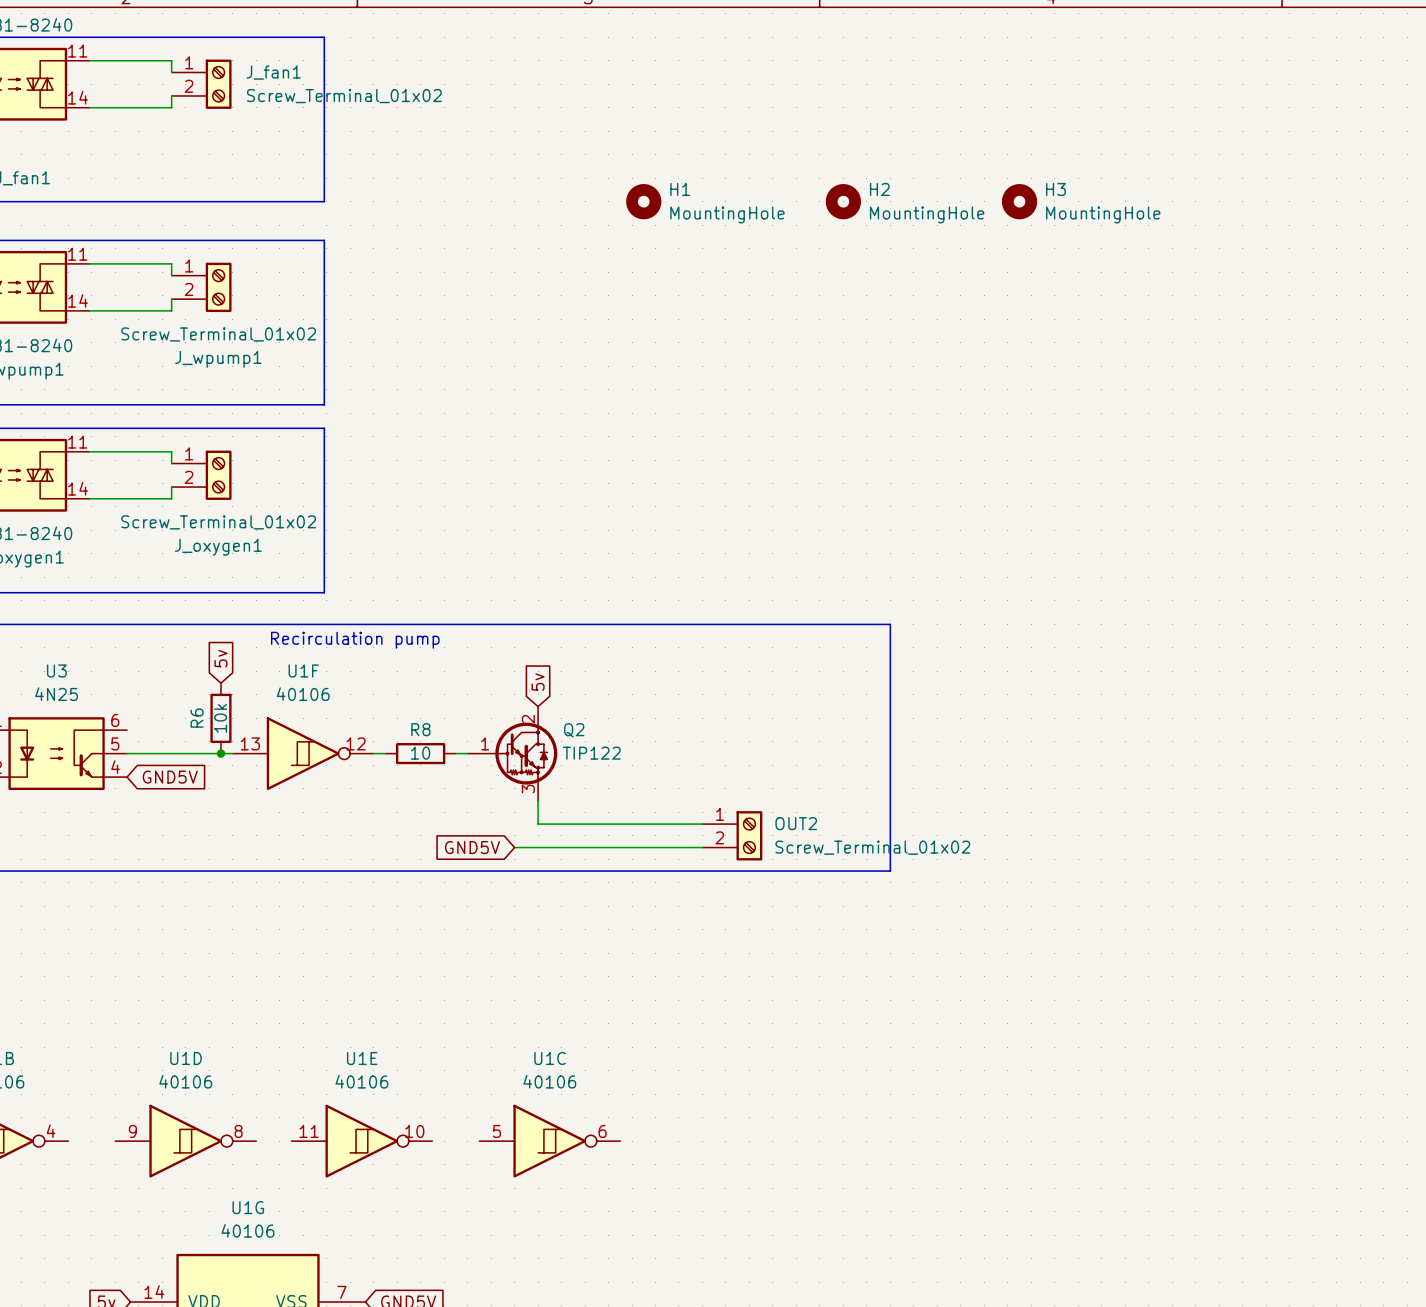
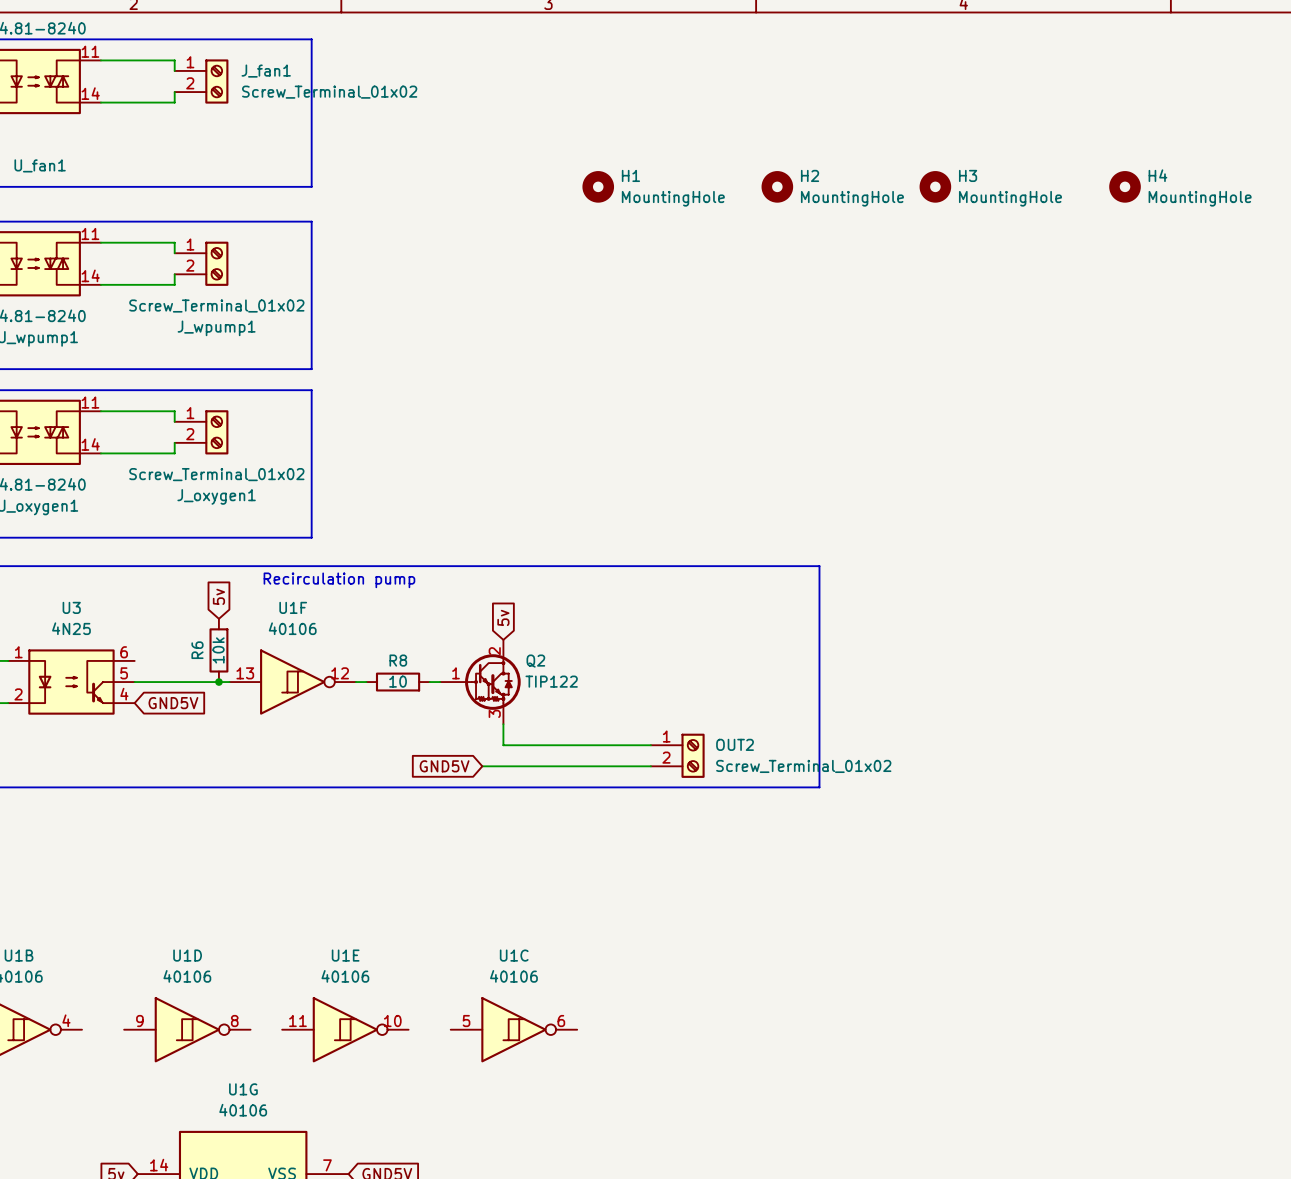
H4: none -> MountingHole (1125, 186)

